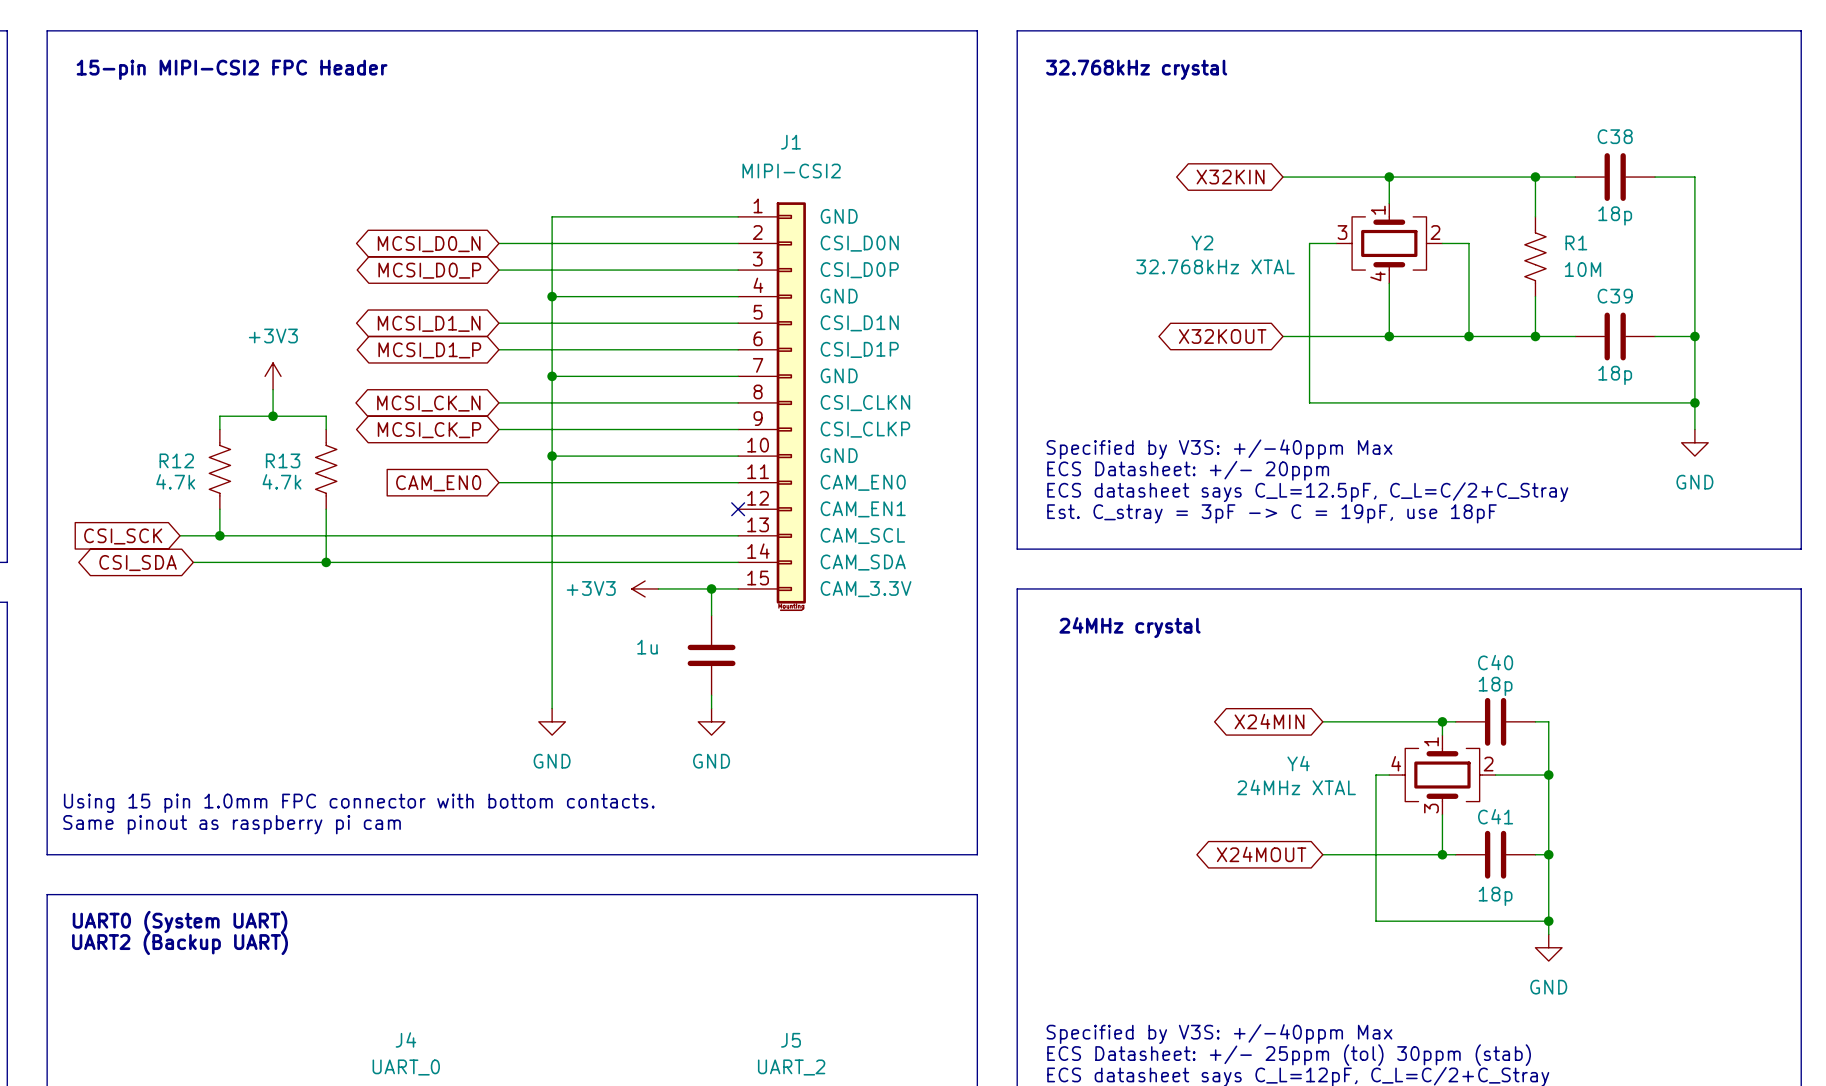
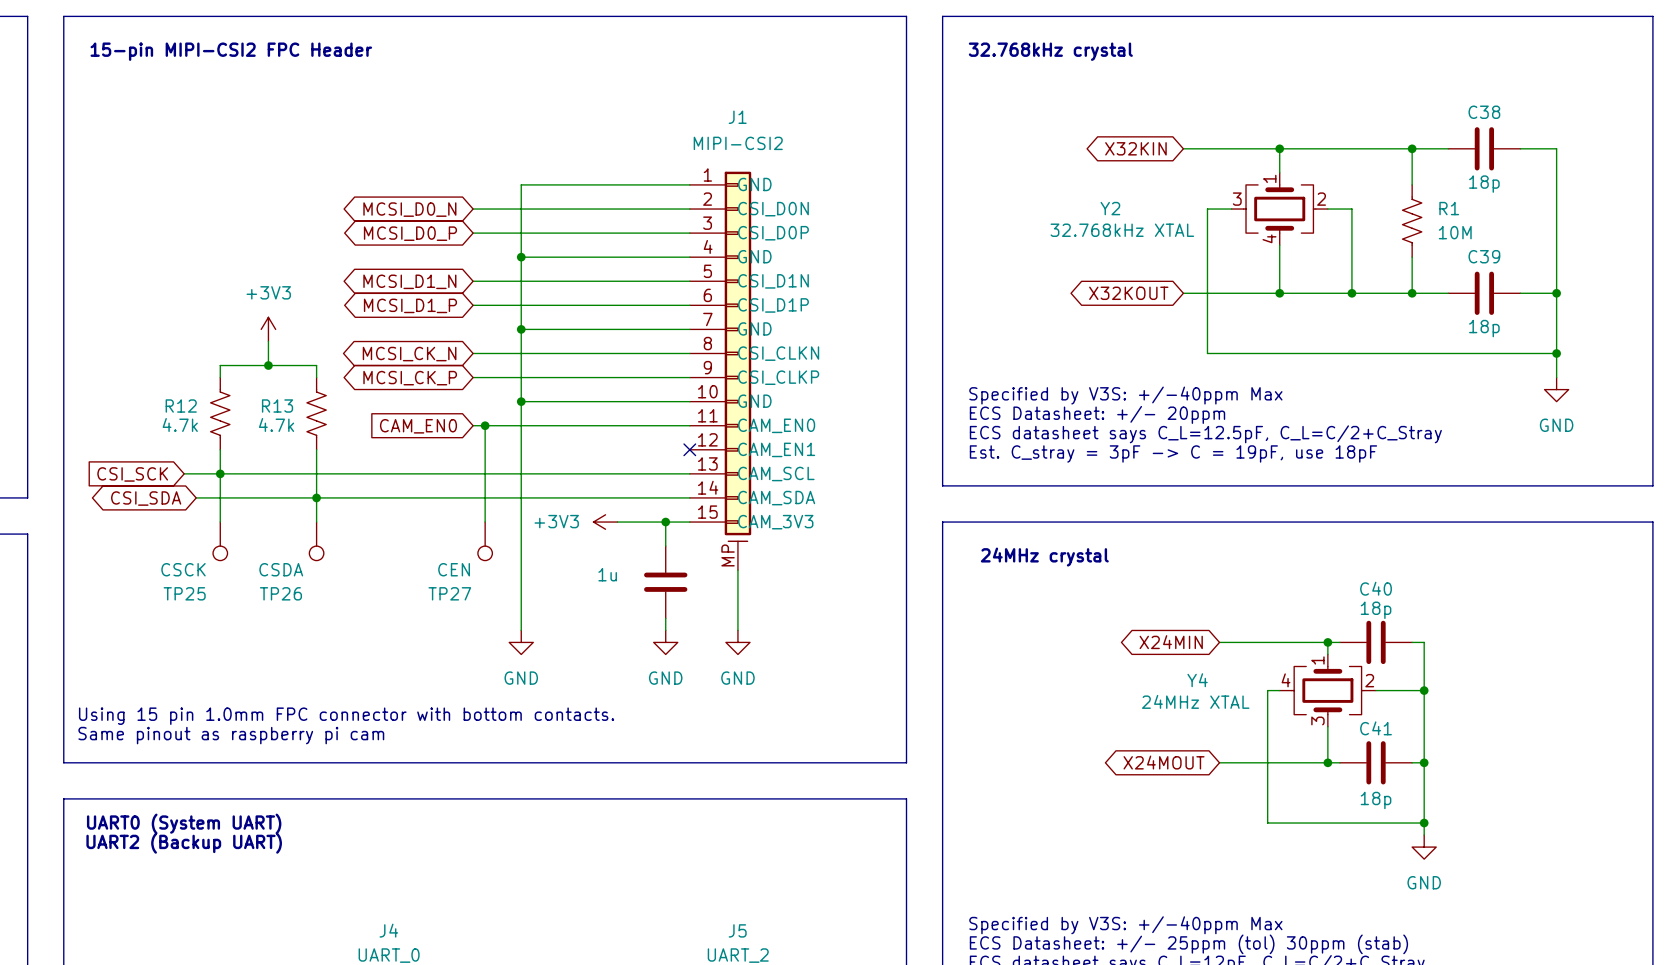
J1 symbol: [738, 202, 806, 612] -> [689, 171, 752, 571]
wire: none -> (485, 425) (485, 522)
junction: none -> (485, 425)
wire: none -> (220, 473) (220, 522)
wire: none -> (316, 497) (316, 522)
TP25: none -> CSCK (220, 541)
TP26: none -> CSDA (316, 541)
TP27: none -> CEN (485, 541)
wire: none -> (737, 570) (737, 630)
power symbol: none -> GND (737, 642)

